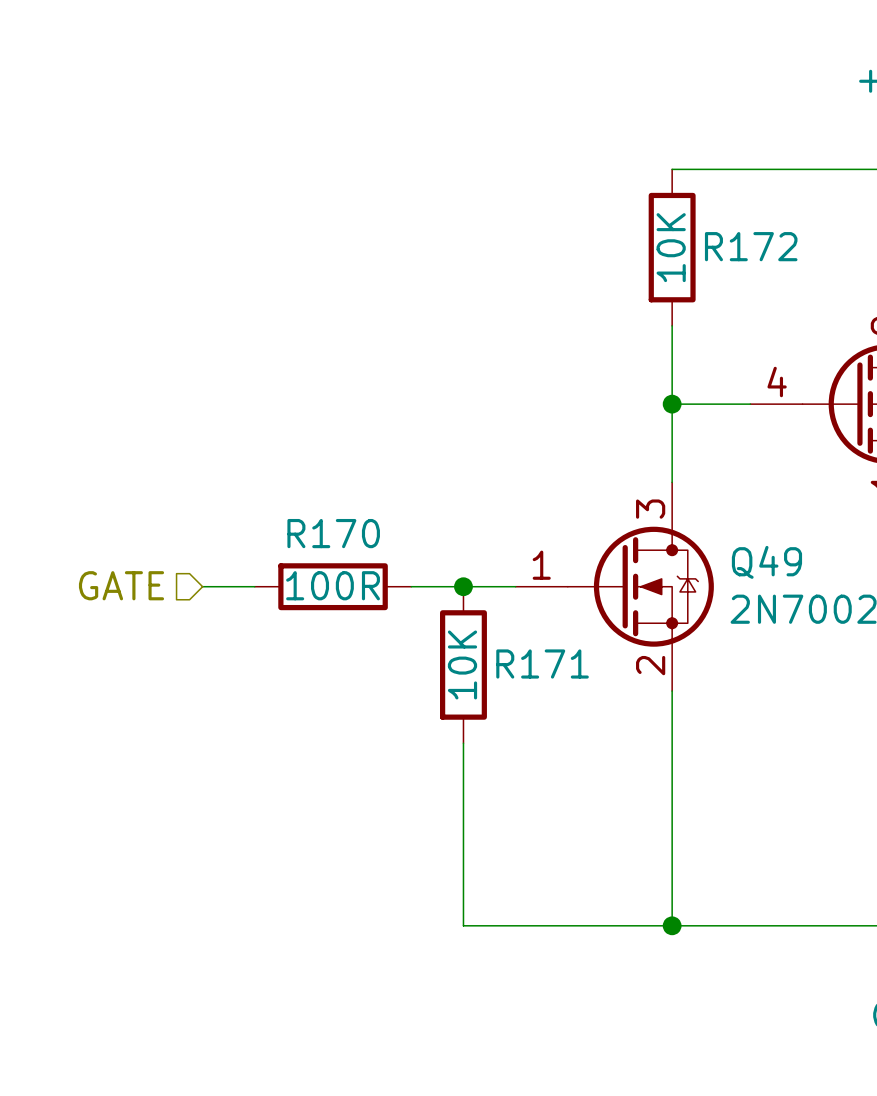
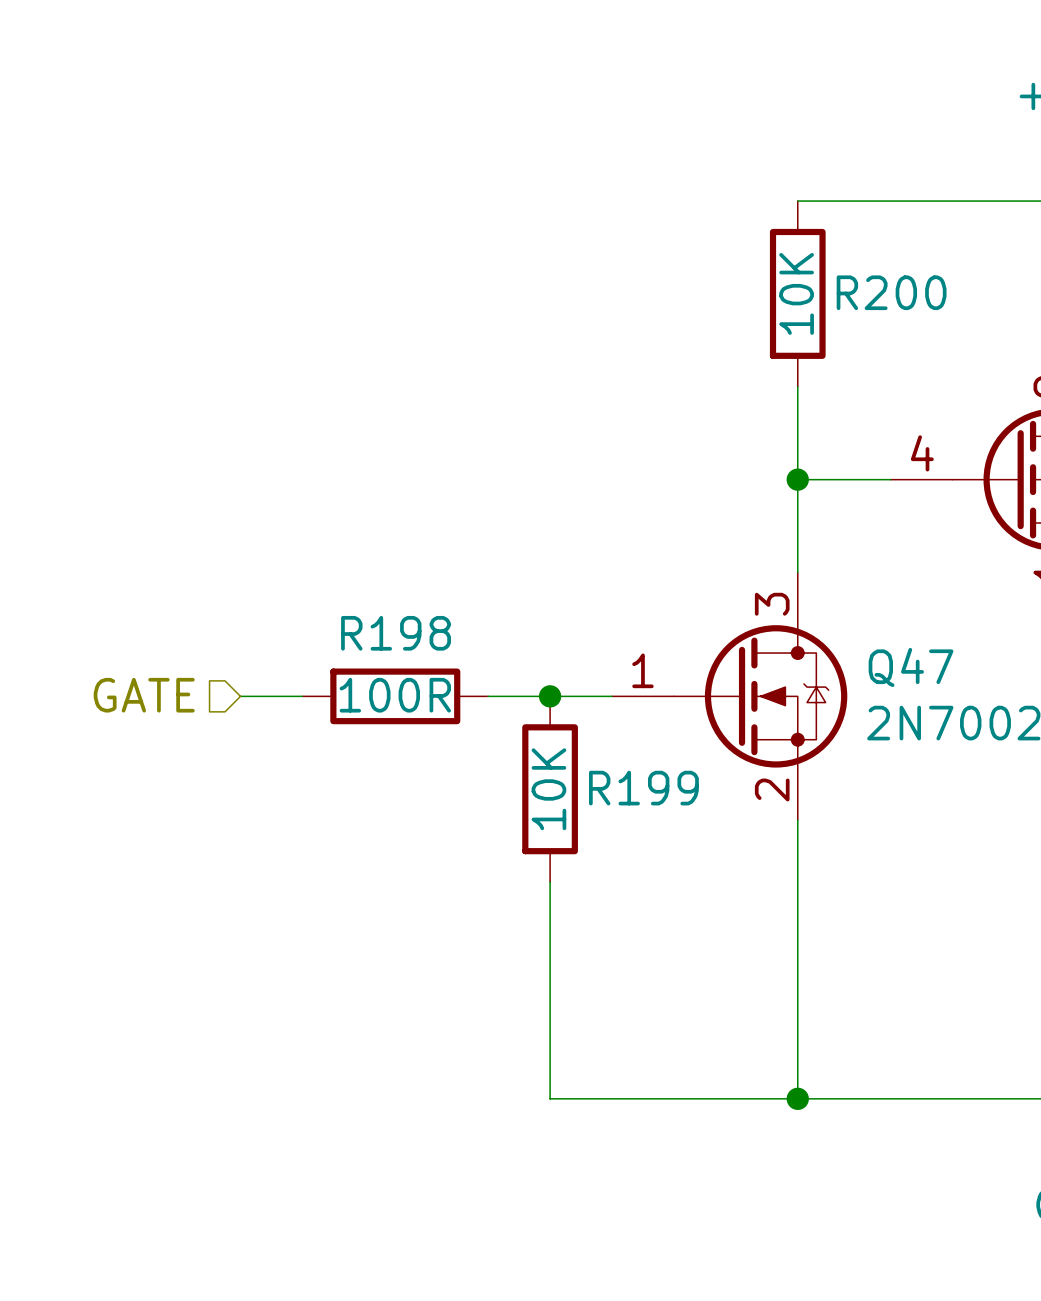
R172 name: R172 (751, 246) -> R200 (891, 292)
R170 name: R170 (333, 533) -> R198 (396, 633)
Q49 name: Q49 (766, 562) -> Q47 (911, 667)
R171 name: R171 (542, 663) -> R199 (643, 788)

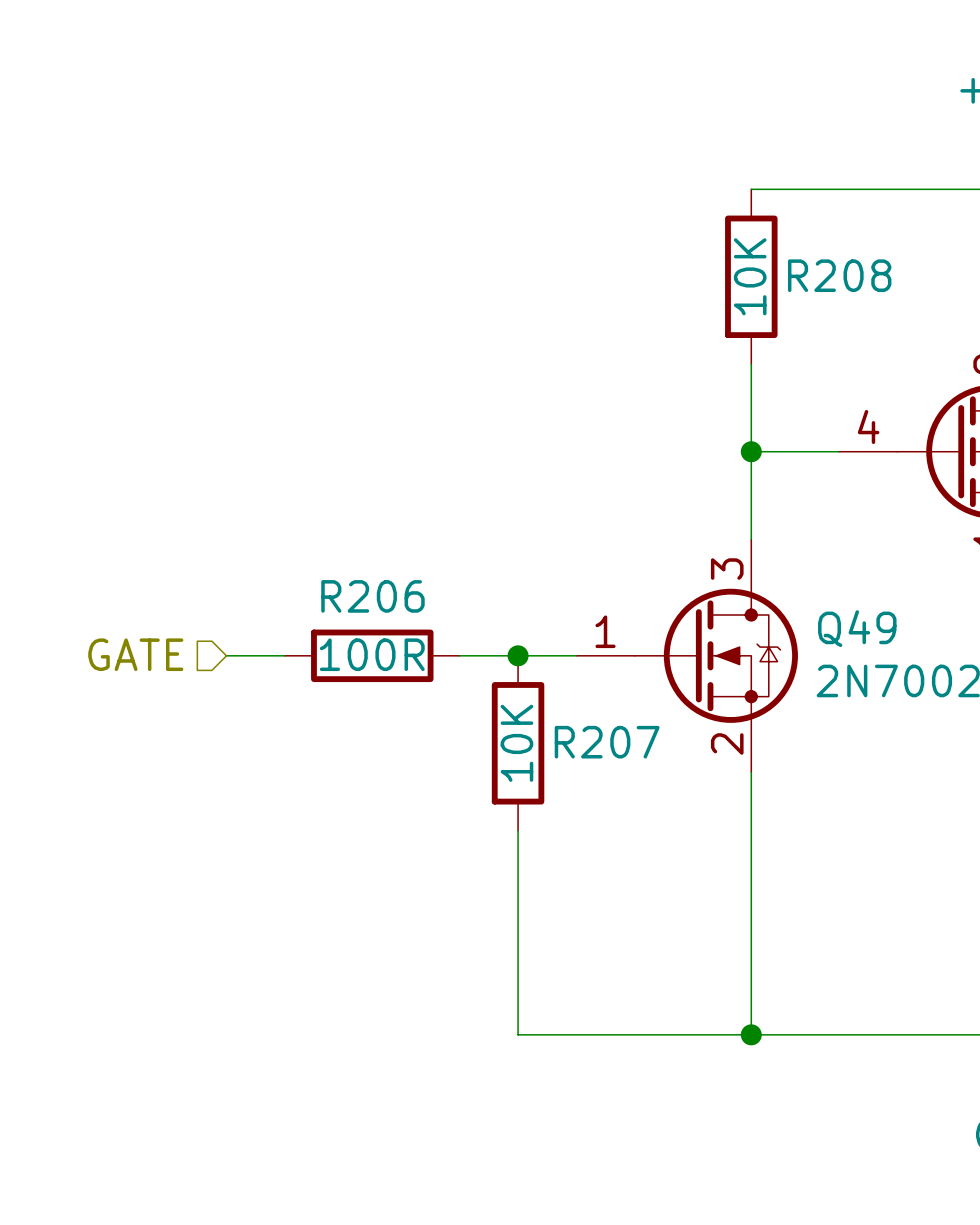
R200 name: R200 (891, 292) -> R208 (839, 275)
R198 name: R198 (396, 633) -> R206 (372, 596)
Q47 name: Q47 (911, 667) -> Q49 (857, 628)
R199 name: R199 (643, 788) -> R207 (607, 742)

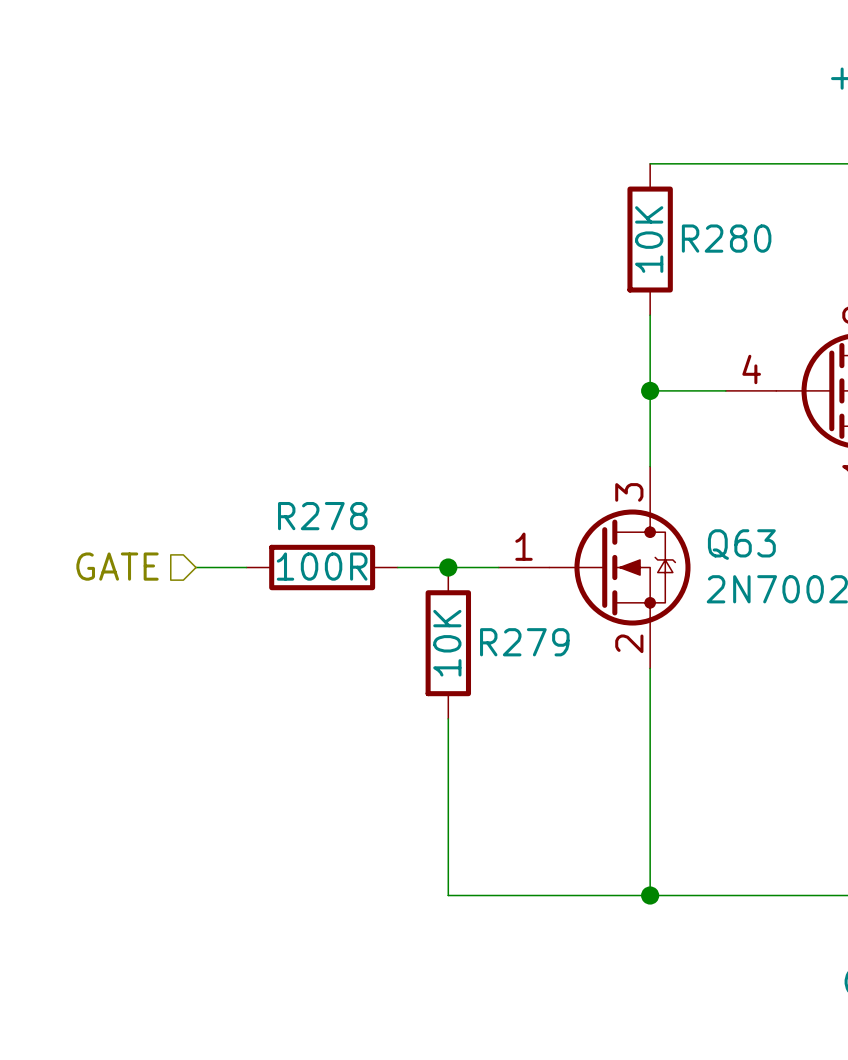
R208 name: R208 (839, 275) -> R280 (726, 238)
R206 name: R206 (372, 596) -> R278 (322, 516)
Q49 name: Q49 (857, 628) -> Q63 (741, 544)
R207 name: R207 (607, 742) -> R279 (524, 642)

